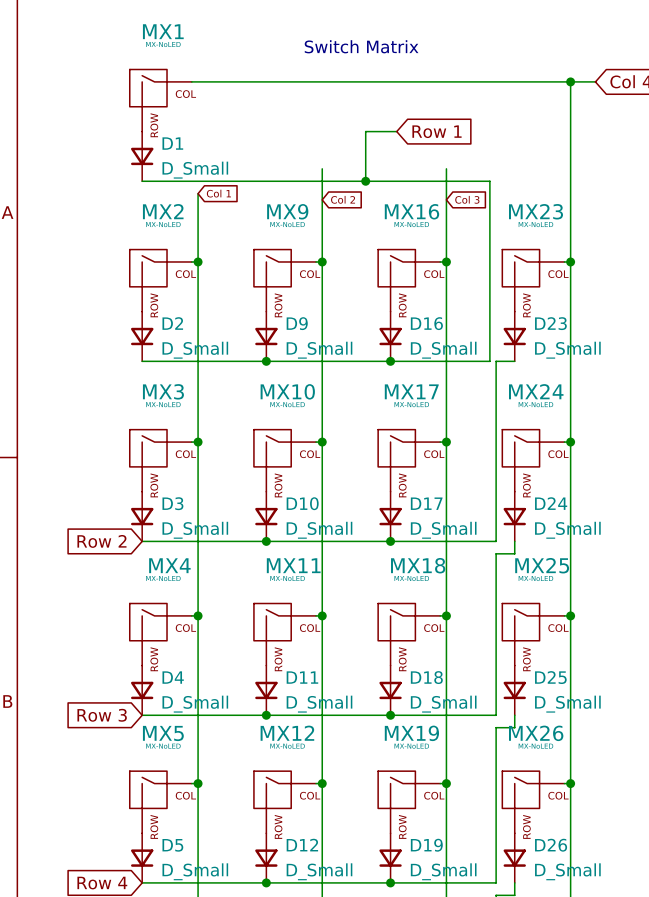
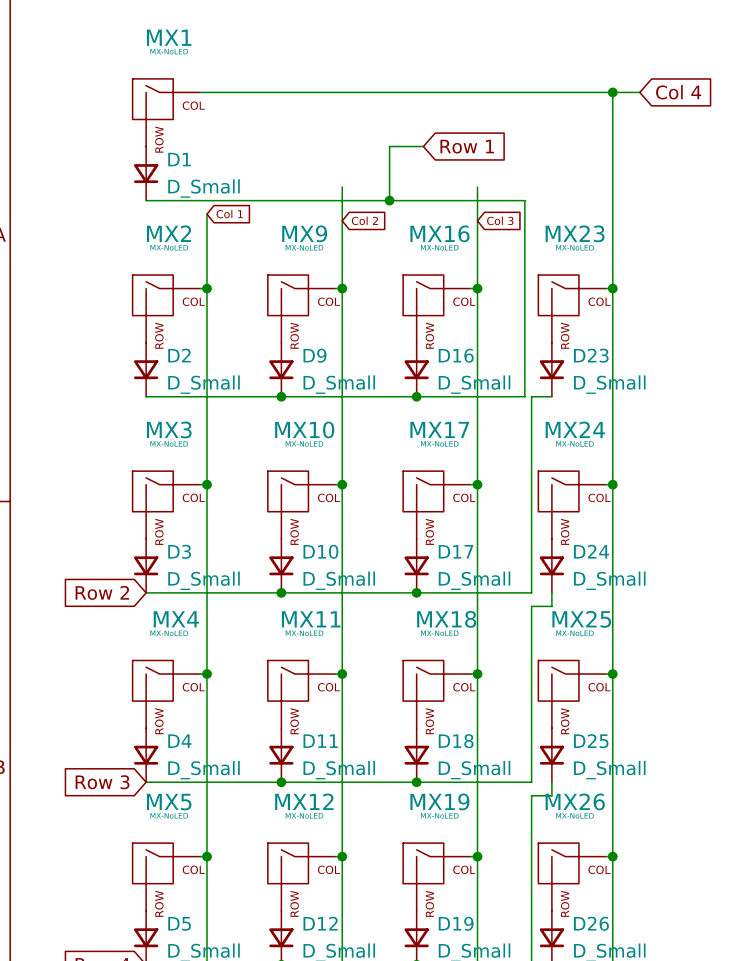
text: Switch Matrix (361, 46) -> none

